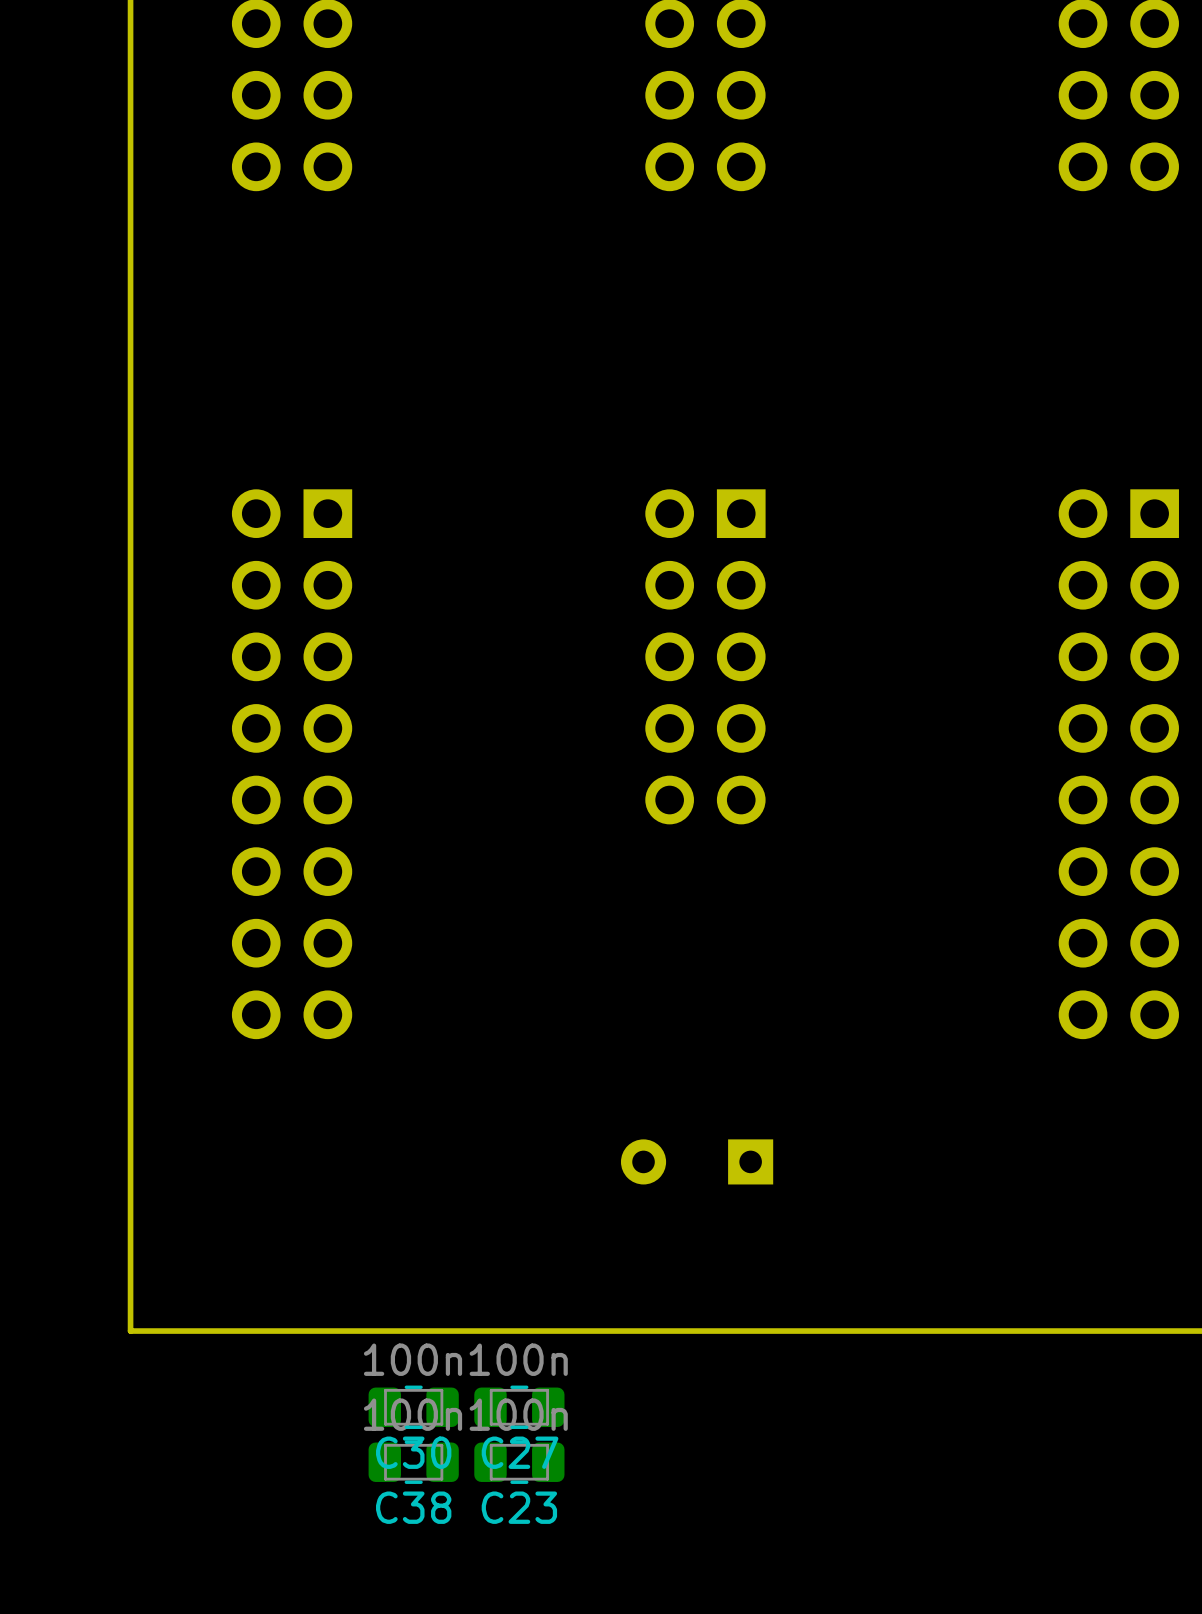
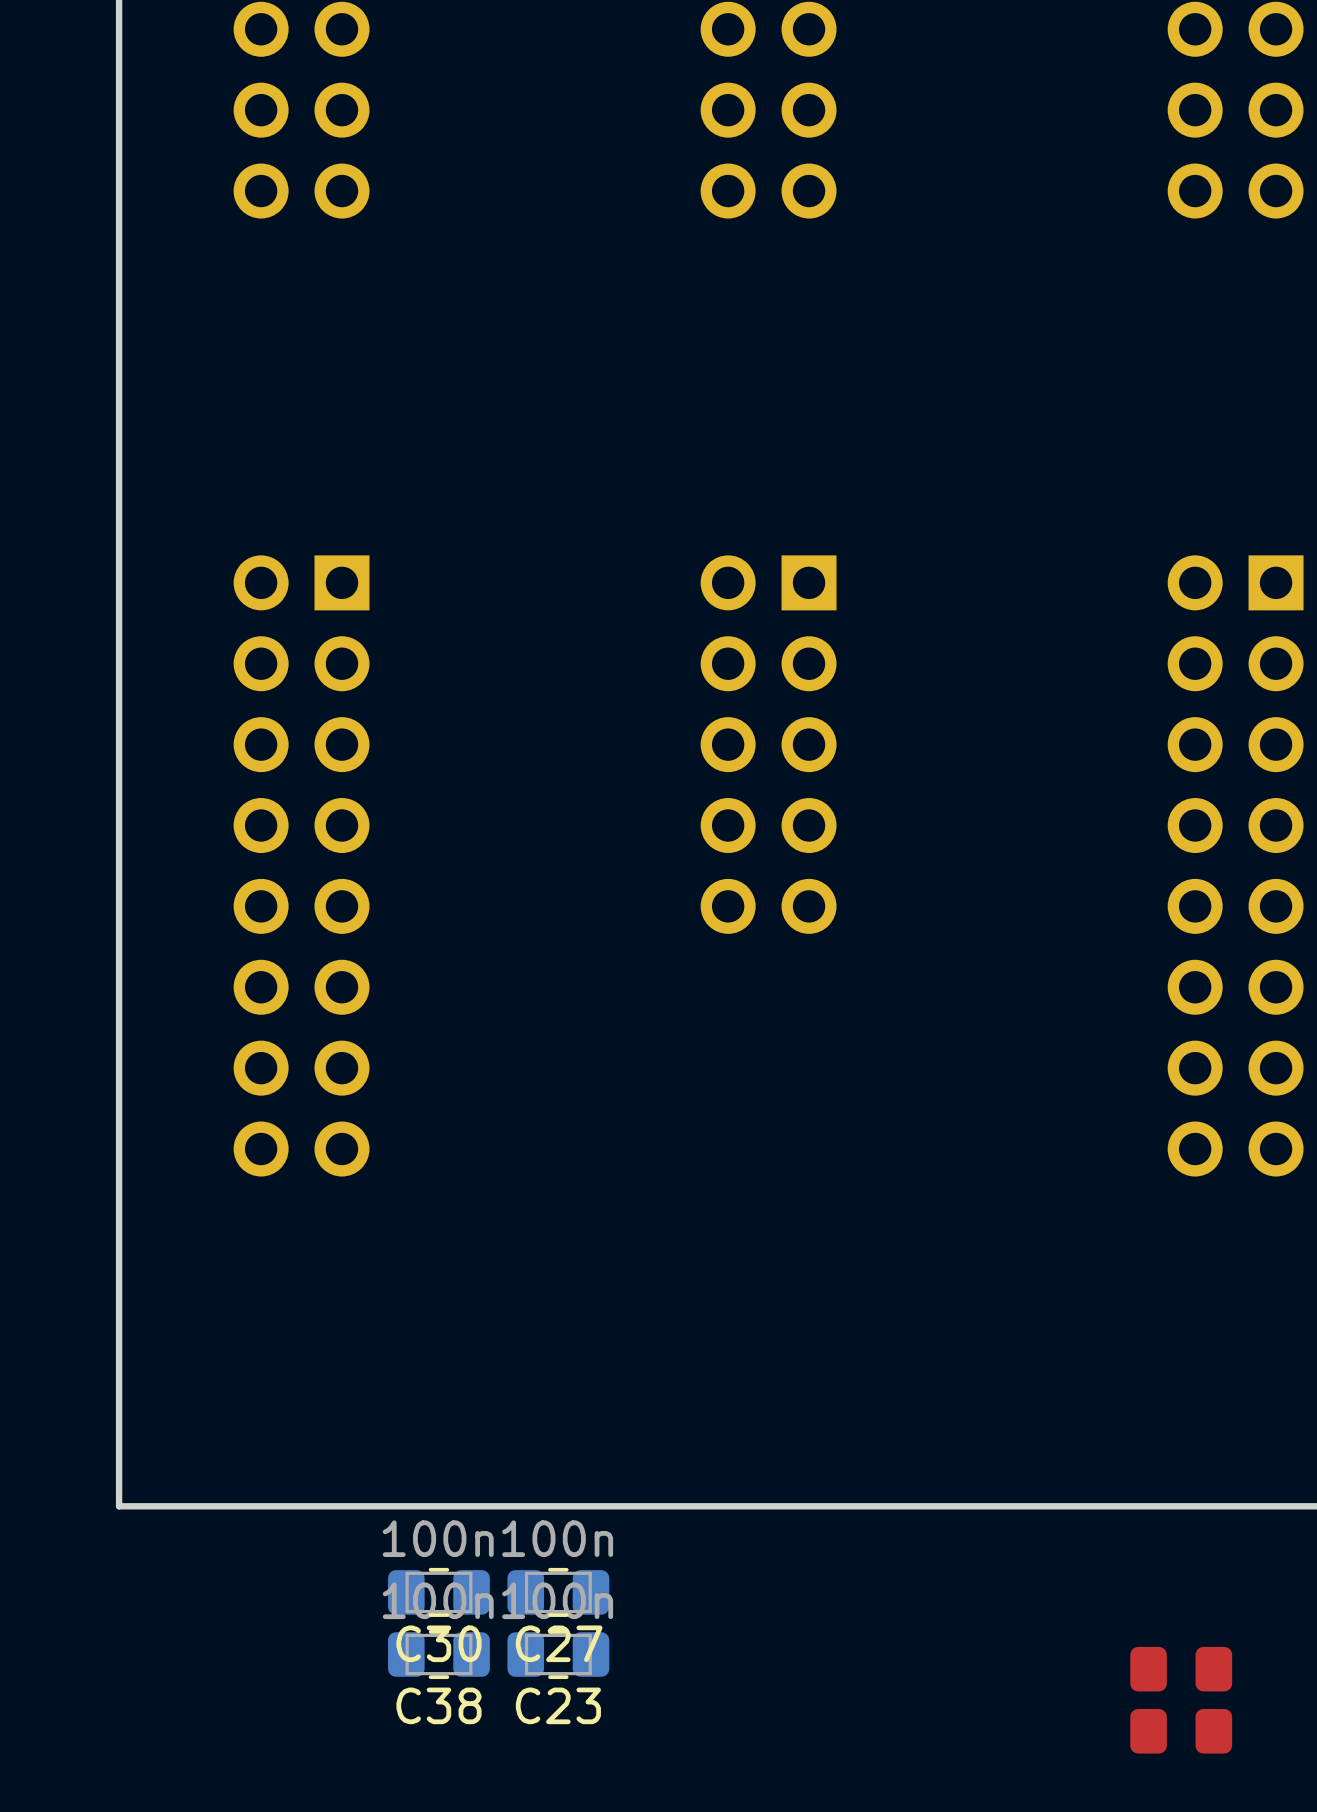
part: (697, 1161) -> none
part: none -> (1181, 1669)
part: none -> (1181, 1731)

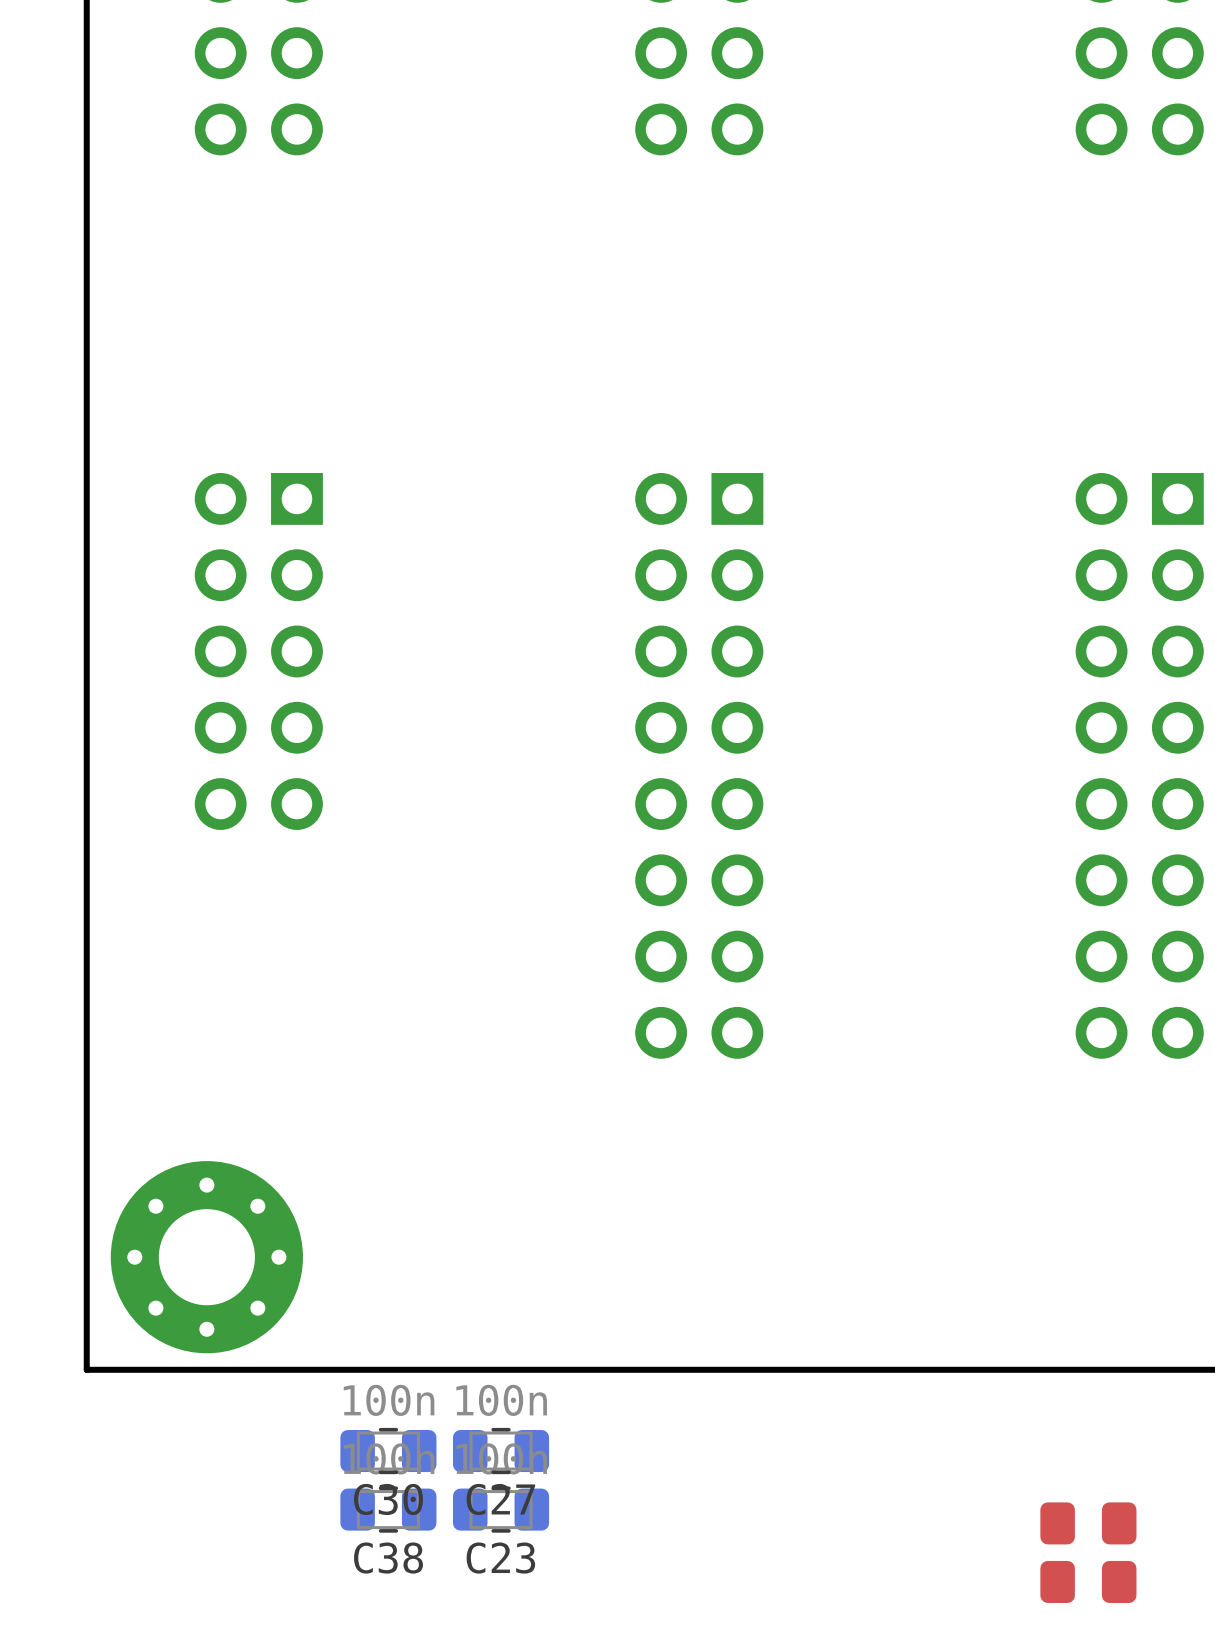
part position: (301, 865) -> (699, 765)
part: none -> (206, 1257)

